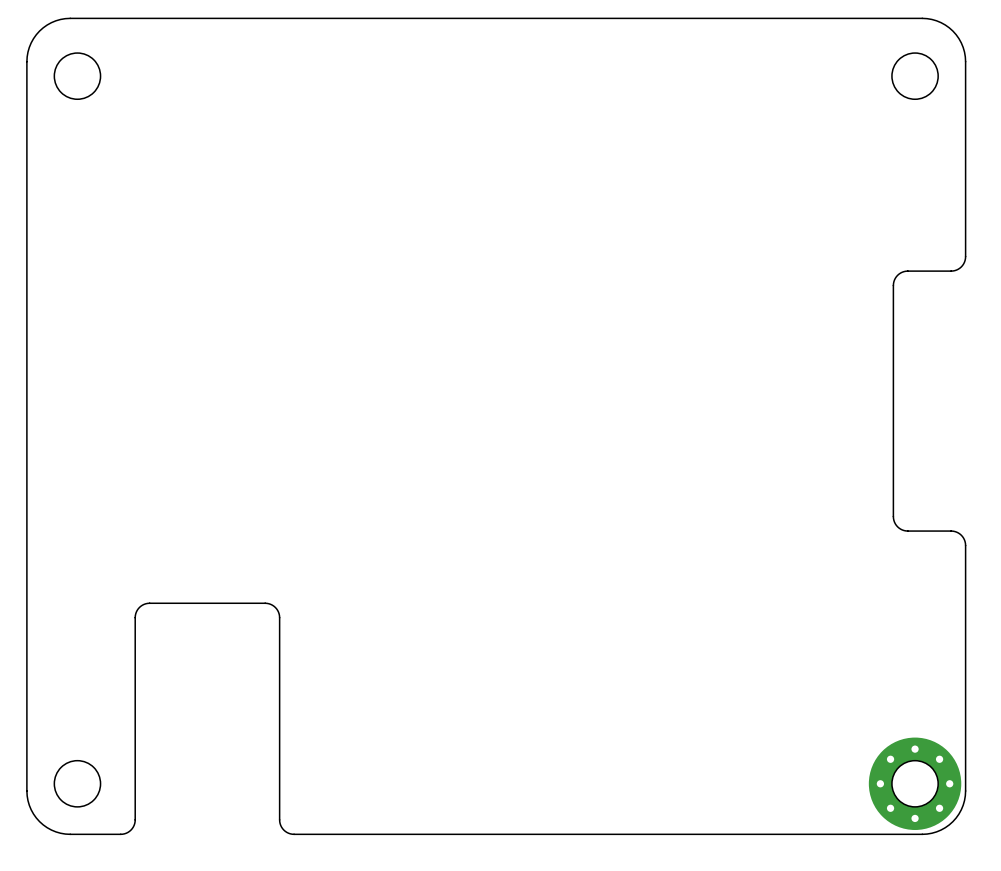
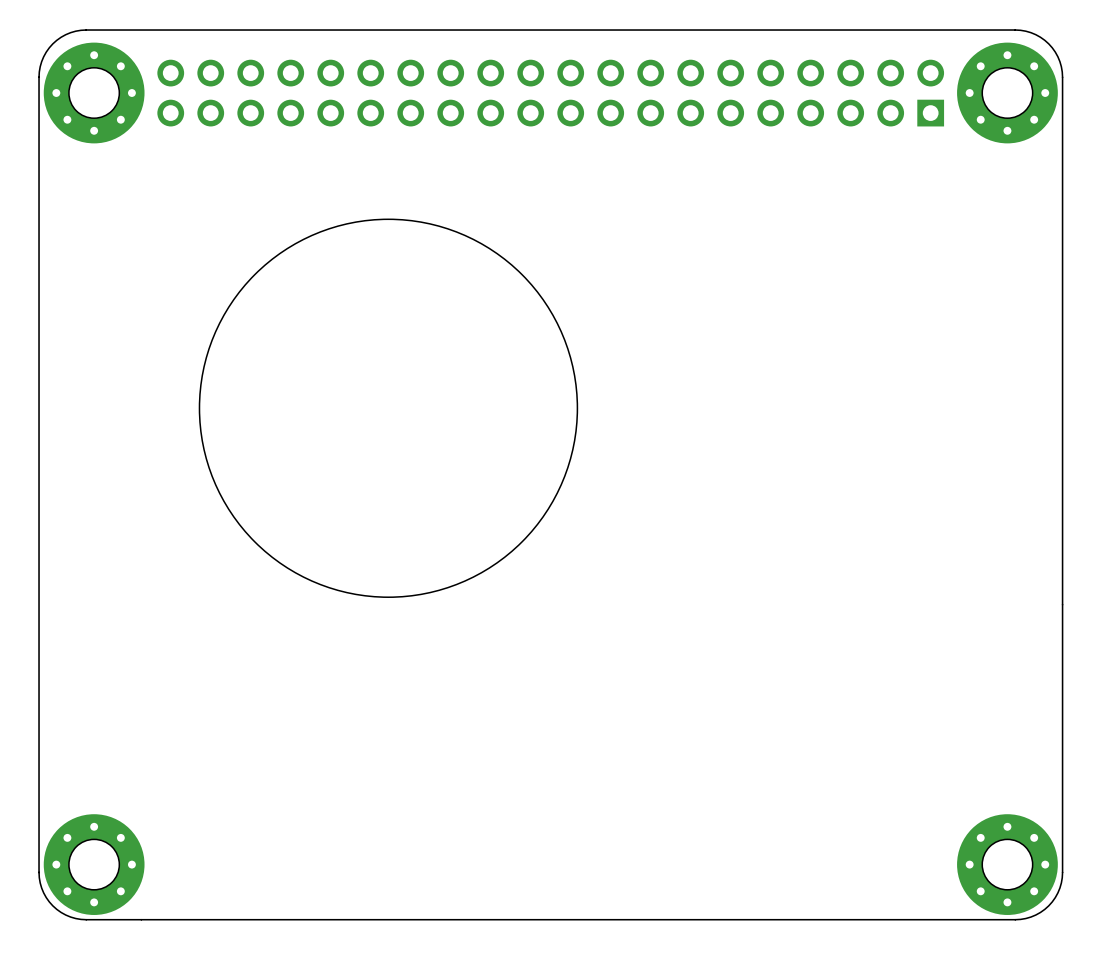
part: none -> (94, 93)
part: none -> (550, 93)
part: none -> (1007, 93)
round board edge: none -> [199, 218, 578, 598]
board edge: (965, 256) (962, 265) (954, 270) (902, 272) (896, 276) (893, 285) (893, 520) (897, 526) (905, 530) (956, 532) (963, 538) (965, 545) -> (1062, 289) (1062, 604)
part: none -> (94, 864)
board edge: (294, 834) (283, 830) (279, 821) (279, 615) (275, 607) (265, 603) (149, 603) (142, 605) (137, 610) (135, 617) (135, 821) (129, 831) (120, 834) -> (330, 919) (141, 919)

